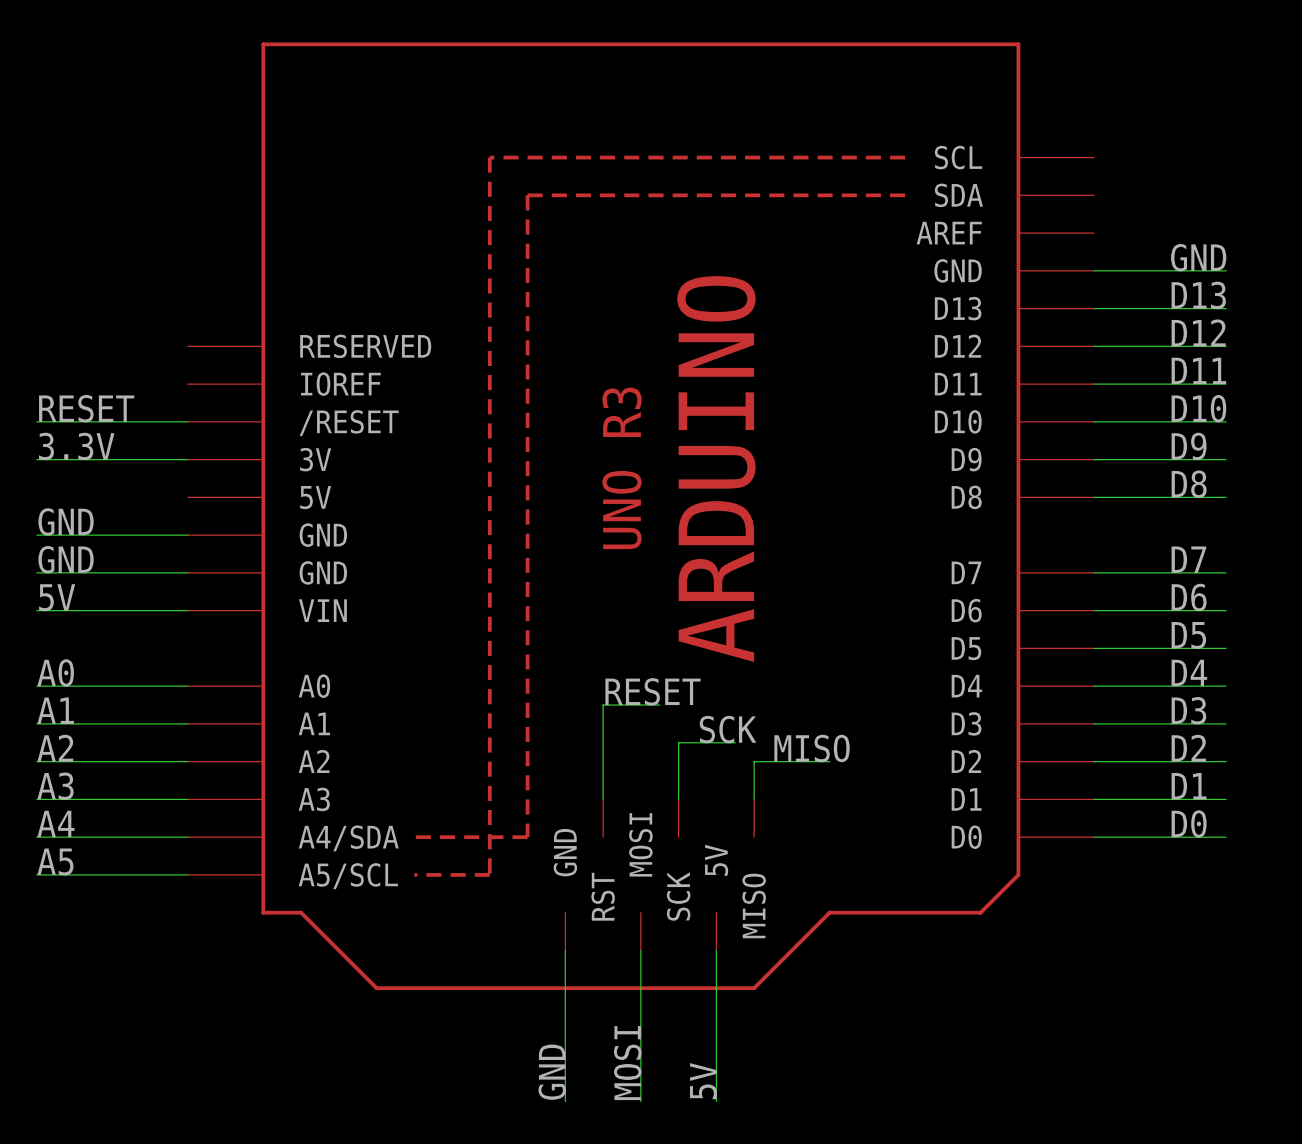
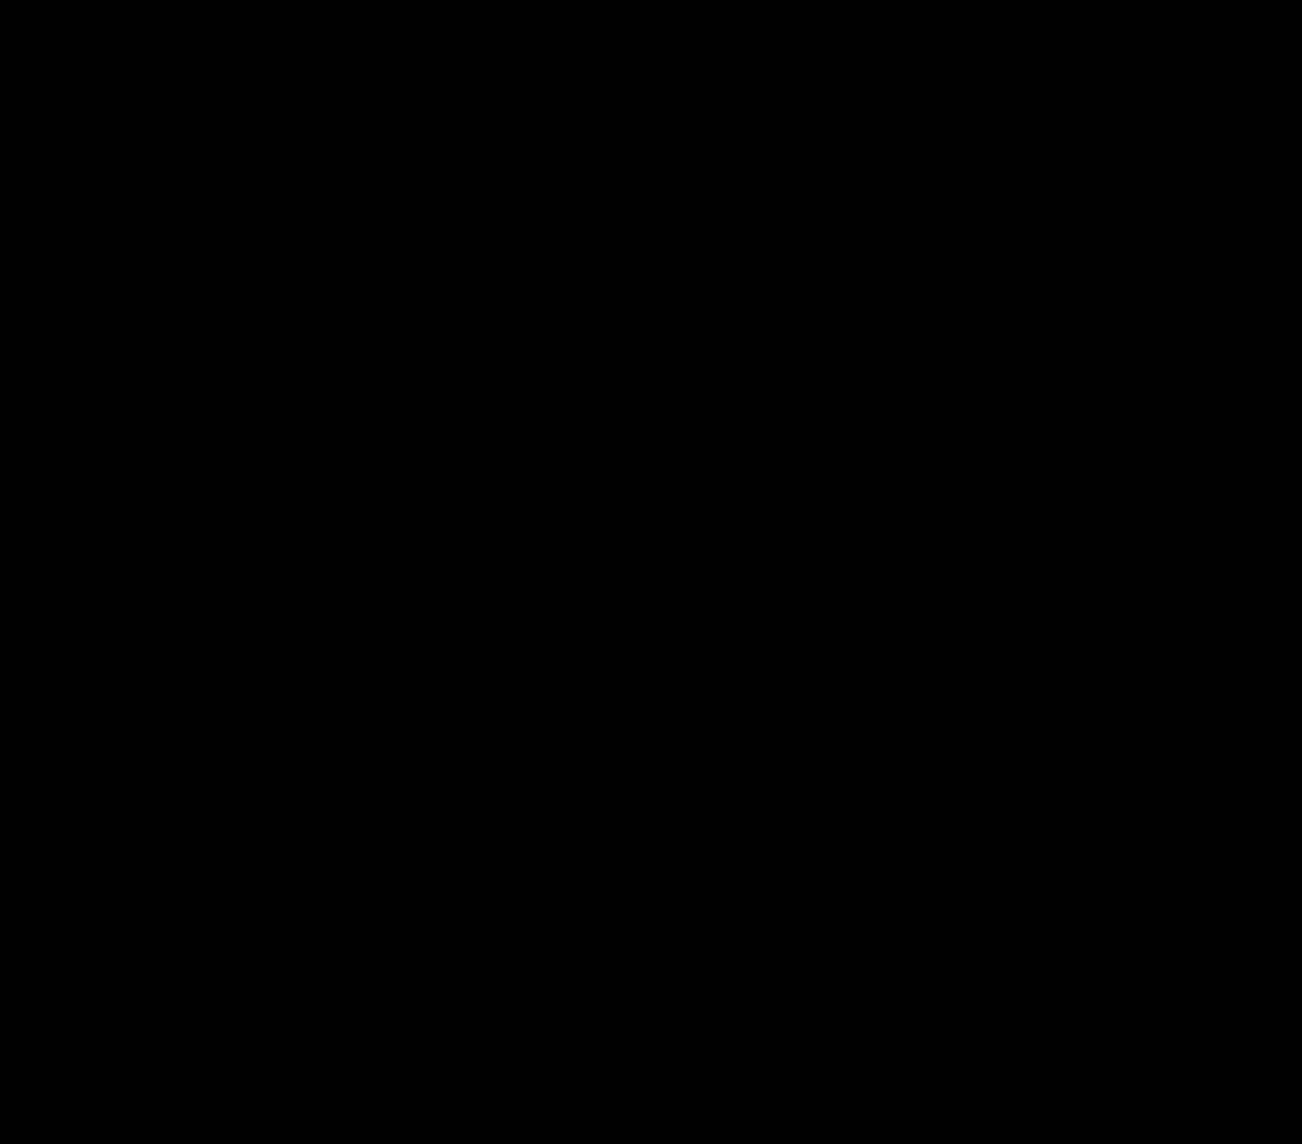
label: GND (1198, 257) -> none
wire: (1093, 270) (1226, 270) -> none
label: D13 (1198, 295) -> none
wire: (1093, 308) (1226, 308) -> none
label: D12 (1198, 332) -> none
wire: (1093, 346) (1226, 346) -> none
label: D11 (1198, 370) -> none
wire: (1093, 384) (1226, 384) -> none
label: RESET (86, 408) -> none
label: D10 (1198, 408) -> none
wire: (36, 421) (187, 421) -> none
wire: (1093, 421) (1226, 421) -> none
label: 3.3V (76, 446) -> none
label: D9 (1189, 446) -> none
wire: (36, 459) (187, 459) -> none
wire: (1093, 459) (1226, 459) -> none
label: D8 (1189, 484) -> none
wire: (1093, 497) (1226, 497) -> none
part: (640, 516) -> none
label: GND (66, 521) -> none
wire: (36, 535) (187, 535) -> none
label: GND (66, 559) -> none
label: D7 (1188, 559) -> none
wire: (36, 572) (187, 572) -> none
wire: (1093, 572) (1226, 572) -> none
label: 5V (57, 597) -> none
label: D6 (1189, 597) -> none
wire: (36, 610) (187, 610) -> none
wire: (1093, 610) (1226, 610) -> none
label: D5 (1188, 635) -> none
wire: (1093, 648) (1226, 648) -> none
label: A0 (55, 672) -> none
label: D4 (1189, 672) -> none
wire: (36, 686) (187, 686) -> none
wire: (1093, 686) (1226, 686) -> none
label: RESET (652, 691) -> none
wire: (659, 705) (603, 705) (603, 799) -> none
label: A1 (55, 710) -> none
label: D3 (1188, 710) -> none
wire: (36, 723) (187, 723) -> none
wire: (1093, 723) (1226, 723) -> none
label: SCK (728, 729) -> none
wire: (735, 742) (678, 742) (678, 799) -> none
label: A2 (55, 748) -> none
label: MISO (812, 748) -> none
label: D2 (1188, 748) -> none
wire: (36, 761) (187, 761) -> none
wire: (829, 761) (754, 761) (754, 799) -> none
wire: (1093, 761) (1226, 761) -> none
label: A3 (55, 786) -> none
label: D1 (1189, 786) -> none
wire: (36, 799) (187, 799) -> none
wire: (1093, 799) (1226, 799) -> none
label: A4 (55, 823) -> none
label: D0 (1189, 823) -> none
wire: (36, 837) (187, 837) -> none
wire: (1093, 837) (1226, 837) -> none
label: A5 (55, 861) -> none
wire: (36, 874) (187, 874) -> none
wire: (565, 950) (565, 1101) -> none
wire: (640, 950) (640, 1101) -> none
wire: (716, 950) (716, 1101) -> none
label: MOSI (627, 1063) -> none
label: GND (552, 1072) -> none
label: 5V (703, 1081) -> none

